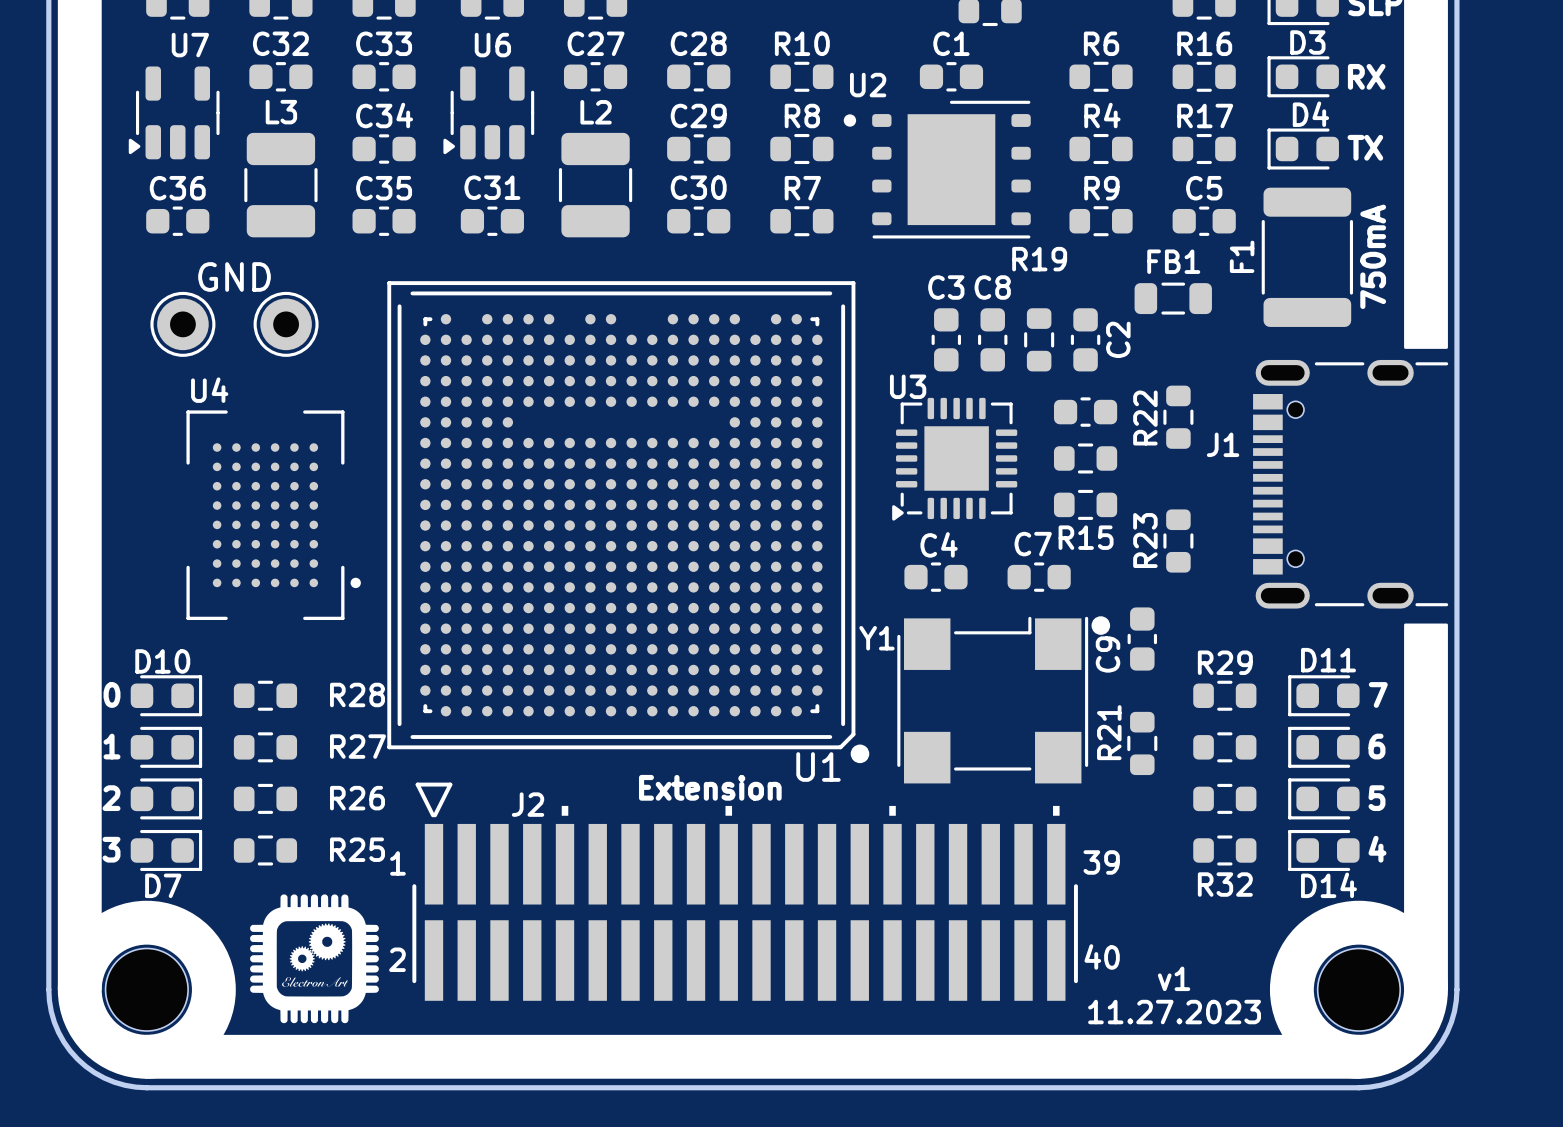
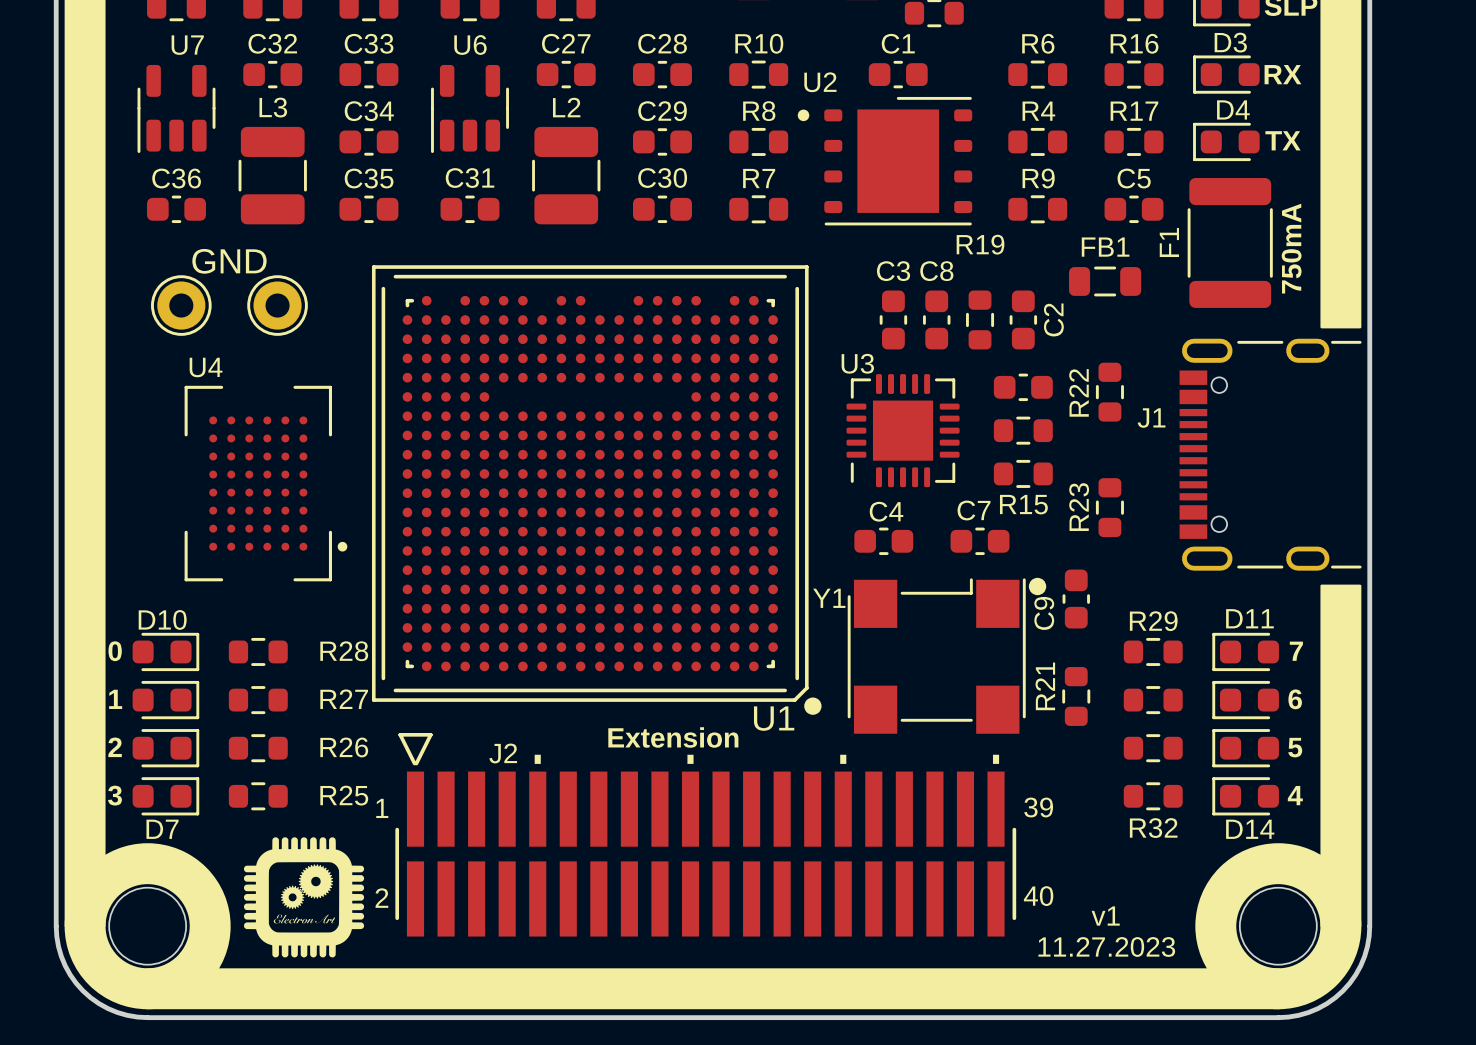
U7 footprint: [128, 66, 220, 160] -> [137, 64, 216, 154]
U6 footprint: [443, 66, 535, 160] -> [431, 64, 509, 154]
U3 footprint: [892, 397, 1018, 521] -> [846, 374, 960, 488]

